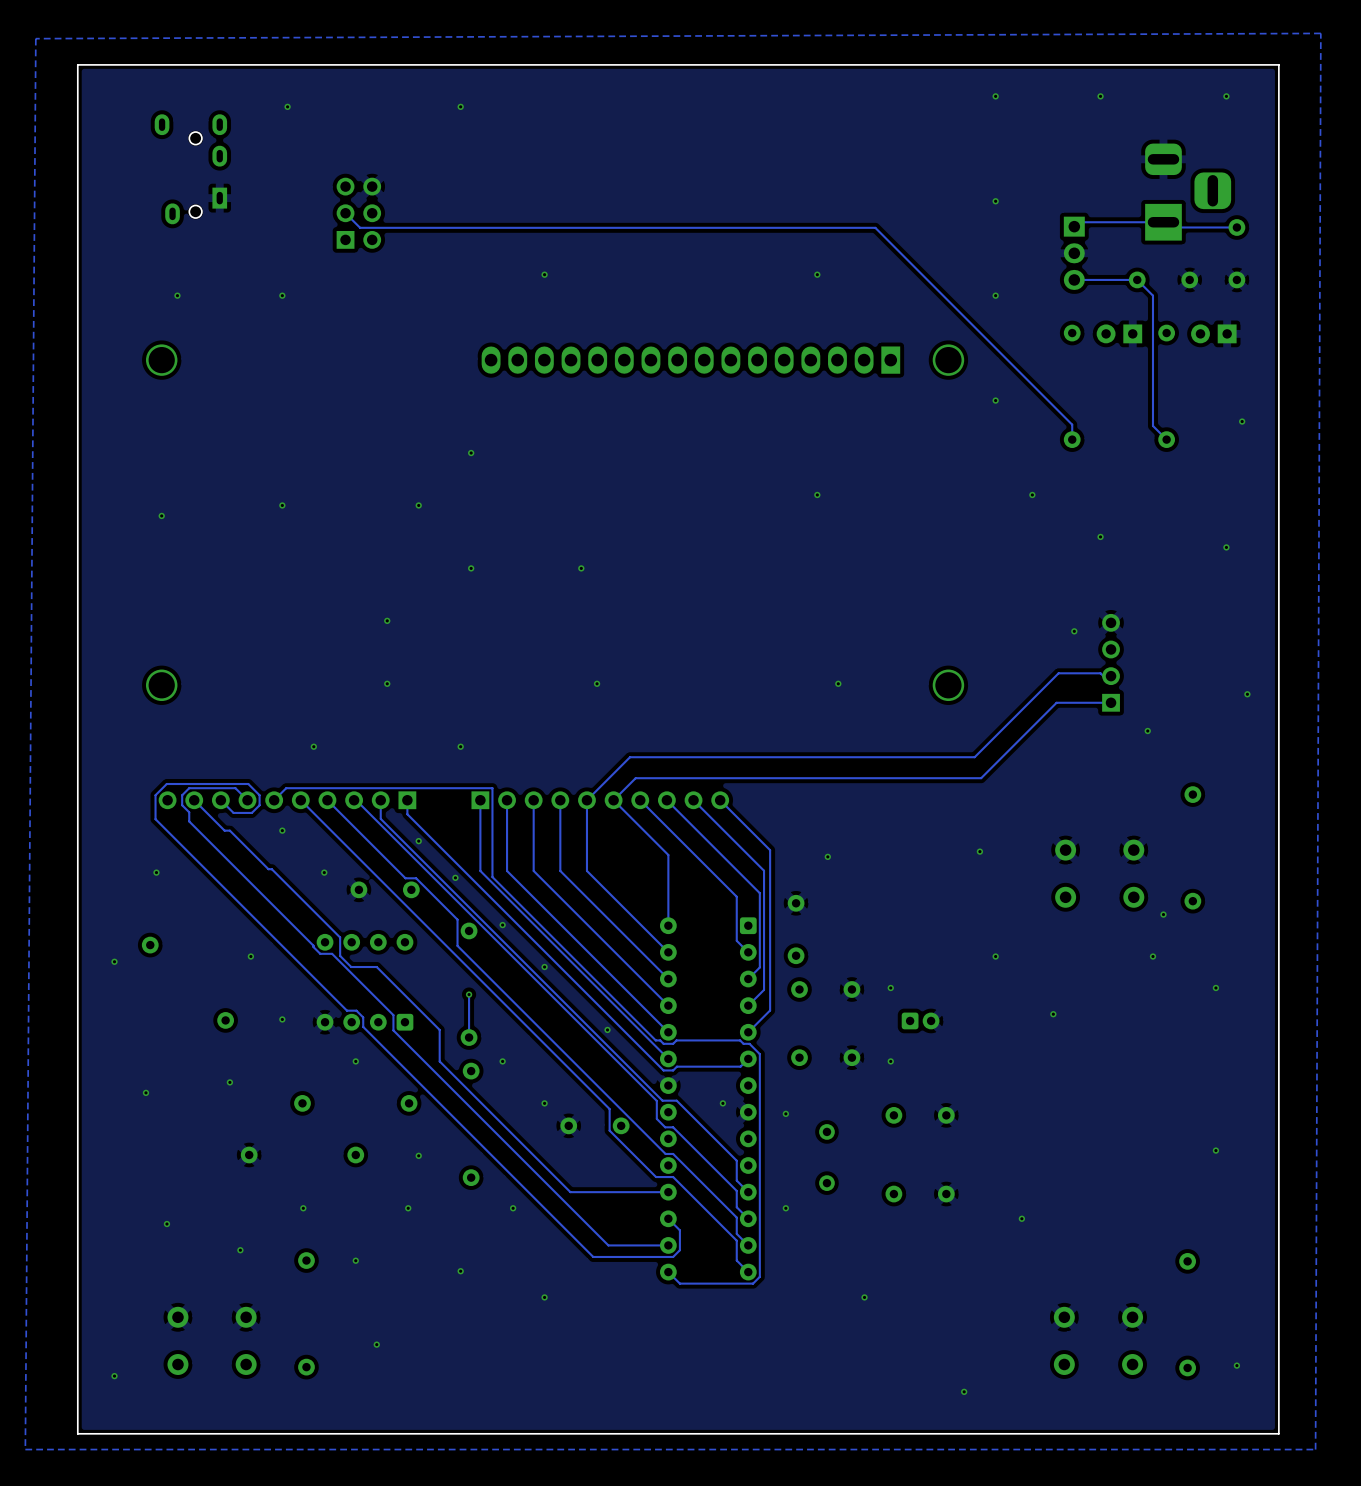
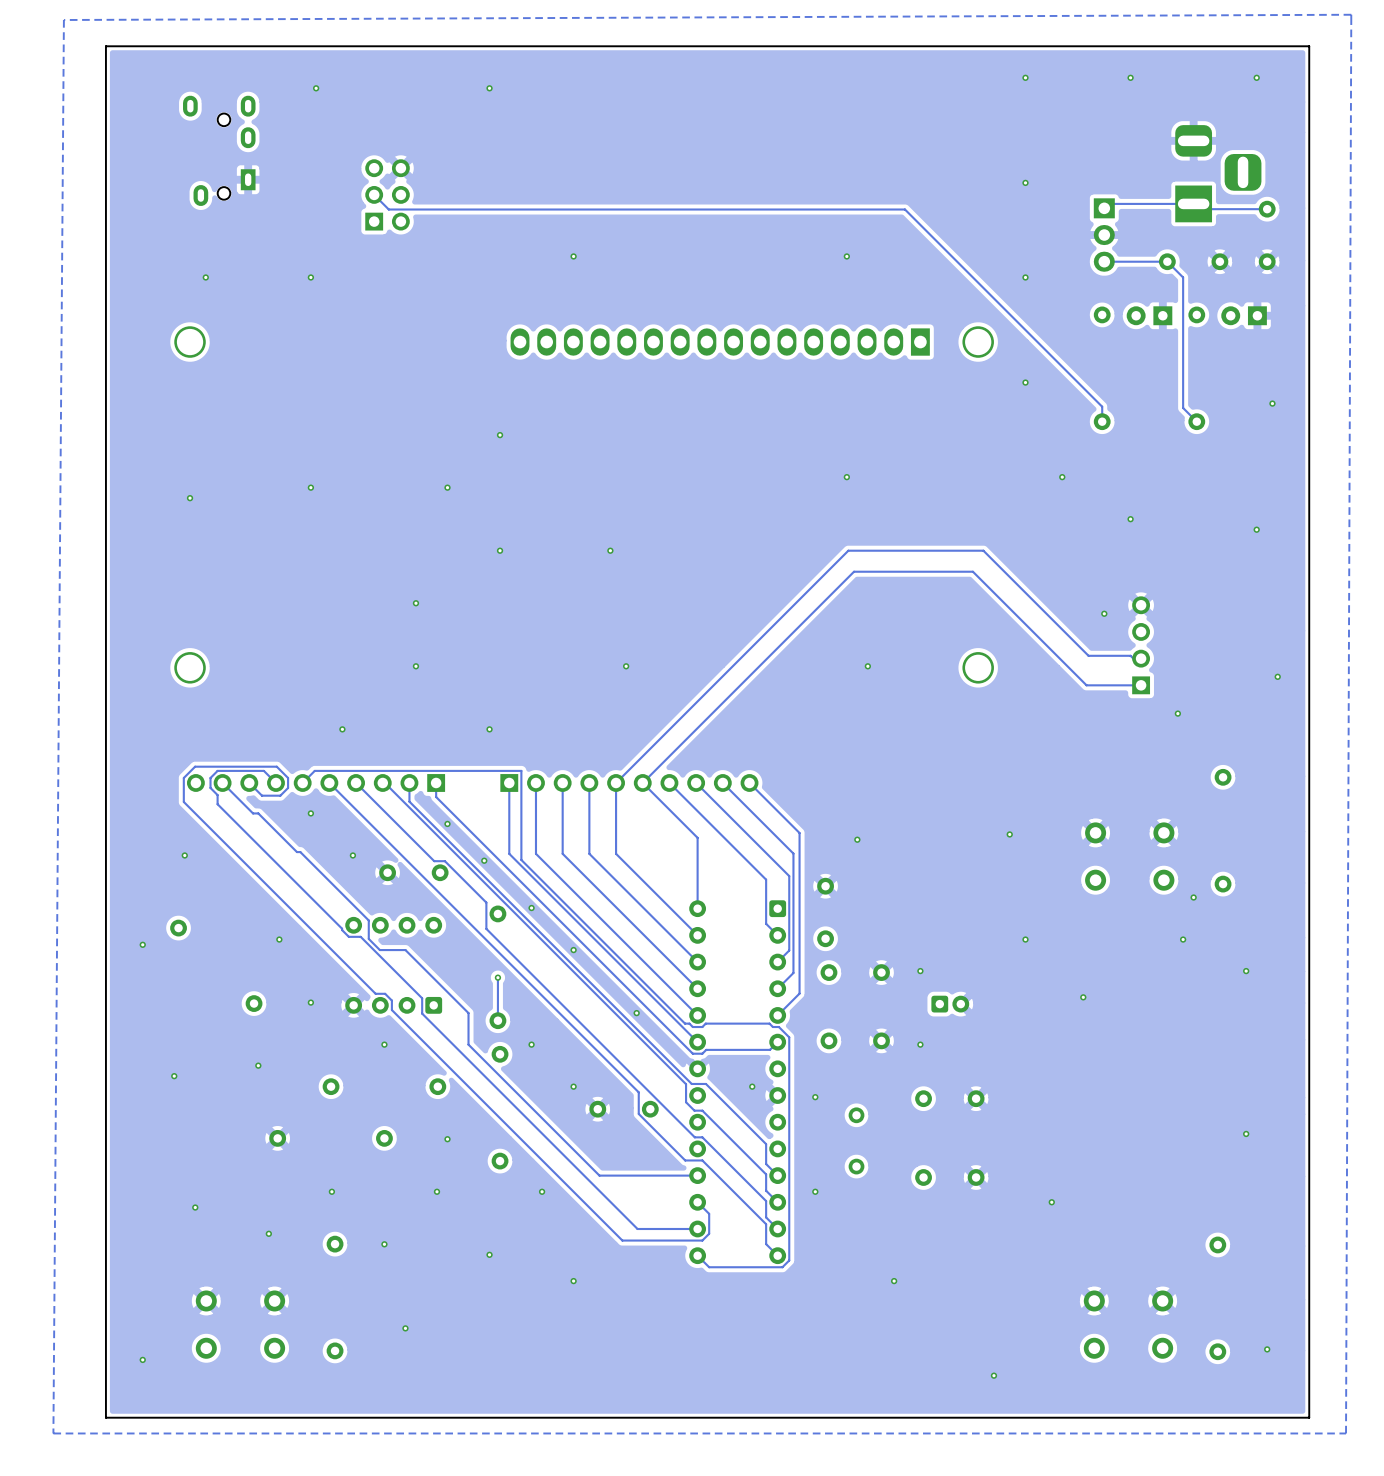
track: (1058, 673) (974, 757) (630, 757) -> (1088, 655) (983, 550) (848, 550) (659, 739)
track: (1056, 702) (981, 778) (635, 778) -> (1086, 685) (972, 571) (854, 571) (664, 760)

